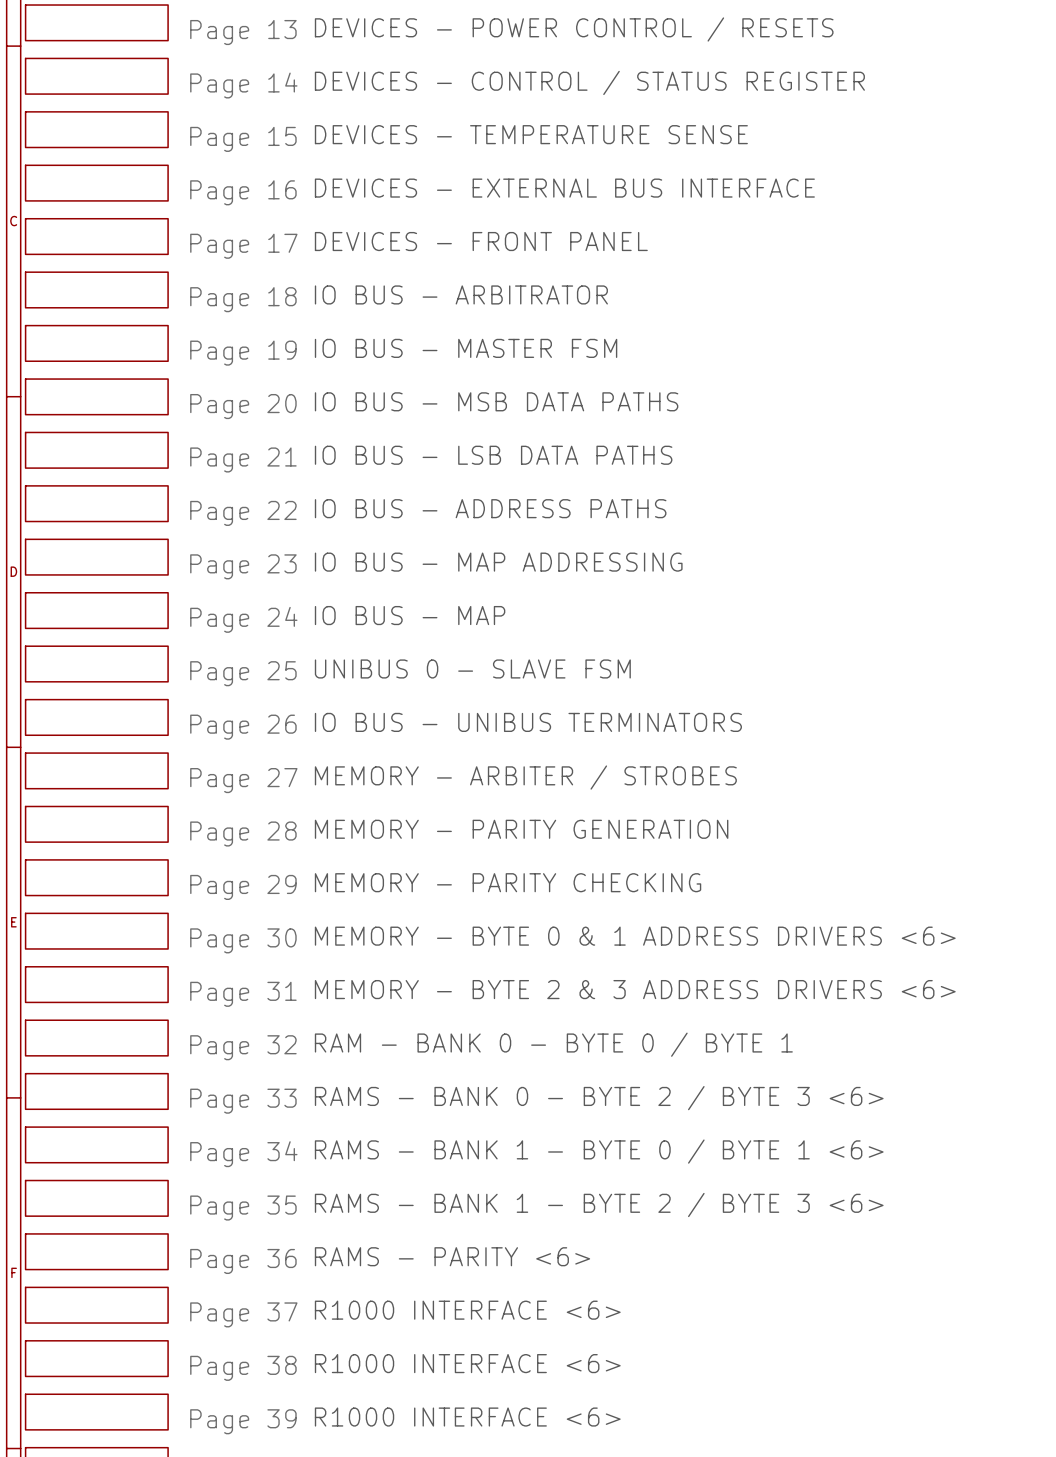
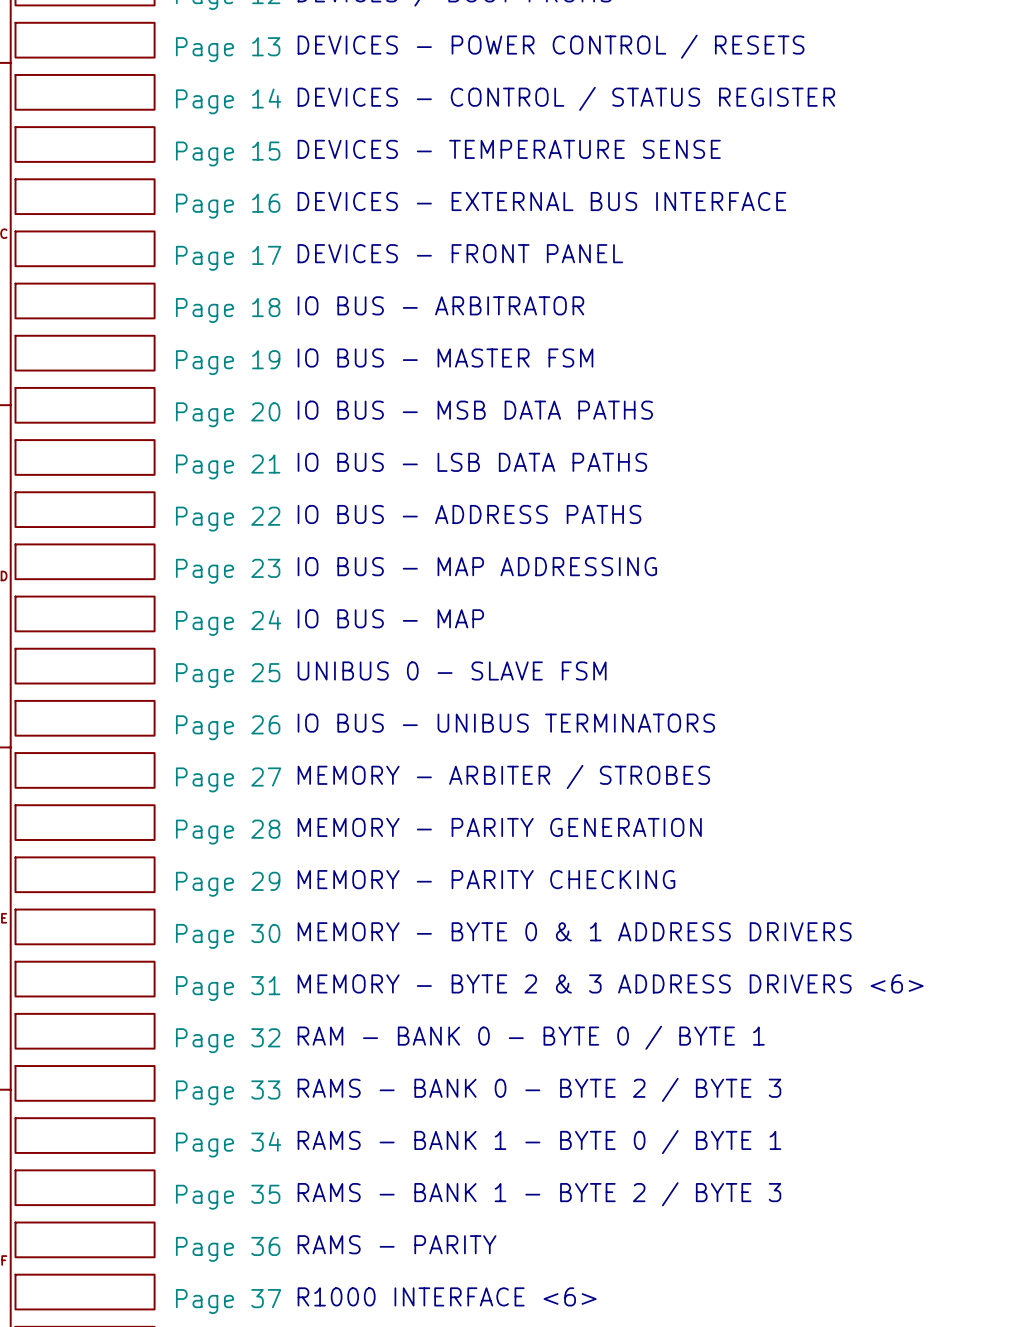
text: MEMORY - BYTE 0 & 1 ADDRESS DRIVERS <6> (635, 936) -> MEMORY - BYTE 0 & 1 ADDRESS DRIVERS (574, 931)
text: RAMS - BANK 0 - BYTE 2 / BYTE 3 <6> (599, 1098) -> RAMS - BANK 0 - BYTE 2 / BYTE 3 (539, 1089)
text: RAMS - BANK 1 - BYTE 0 / BYTE 1 <6> (599, 1151) -> RAMS - BANK 1 - BYTE 0 / BYTE 1 (539, 1142)
text: RAMS - BANK 1 - BYTE 2 / BYTE 3 <6> (599, 1205) -> RAMS - BANK 1 - BYTE 2 / BYTE 3 (539, 1194)
text: RAMS - PARITY <6> (452, 1256) -> RAMS - PARITY (397, 1244)

